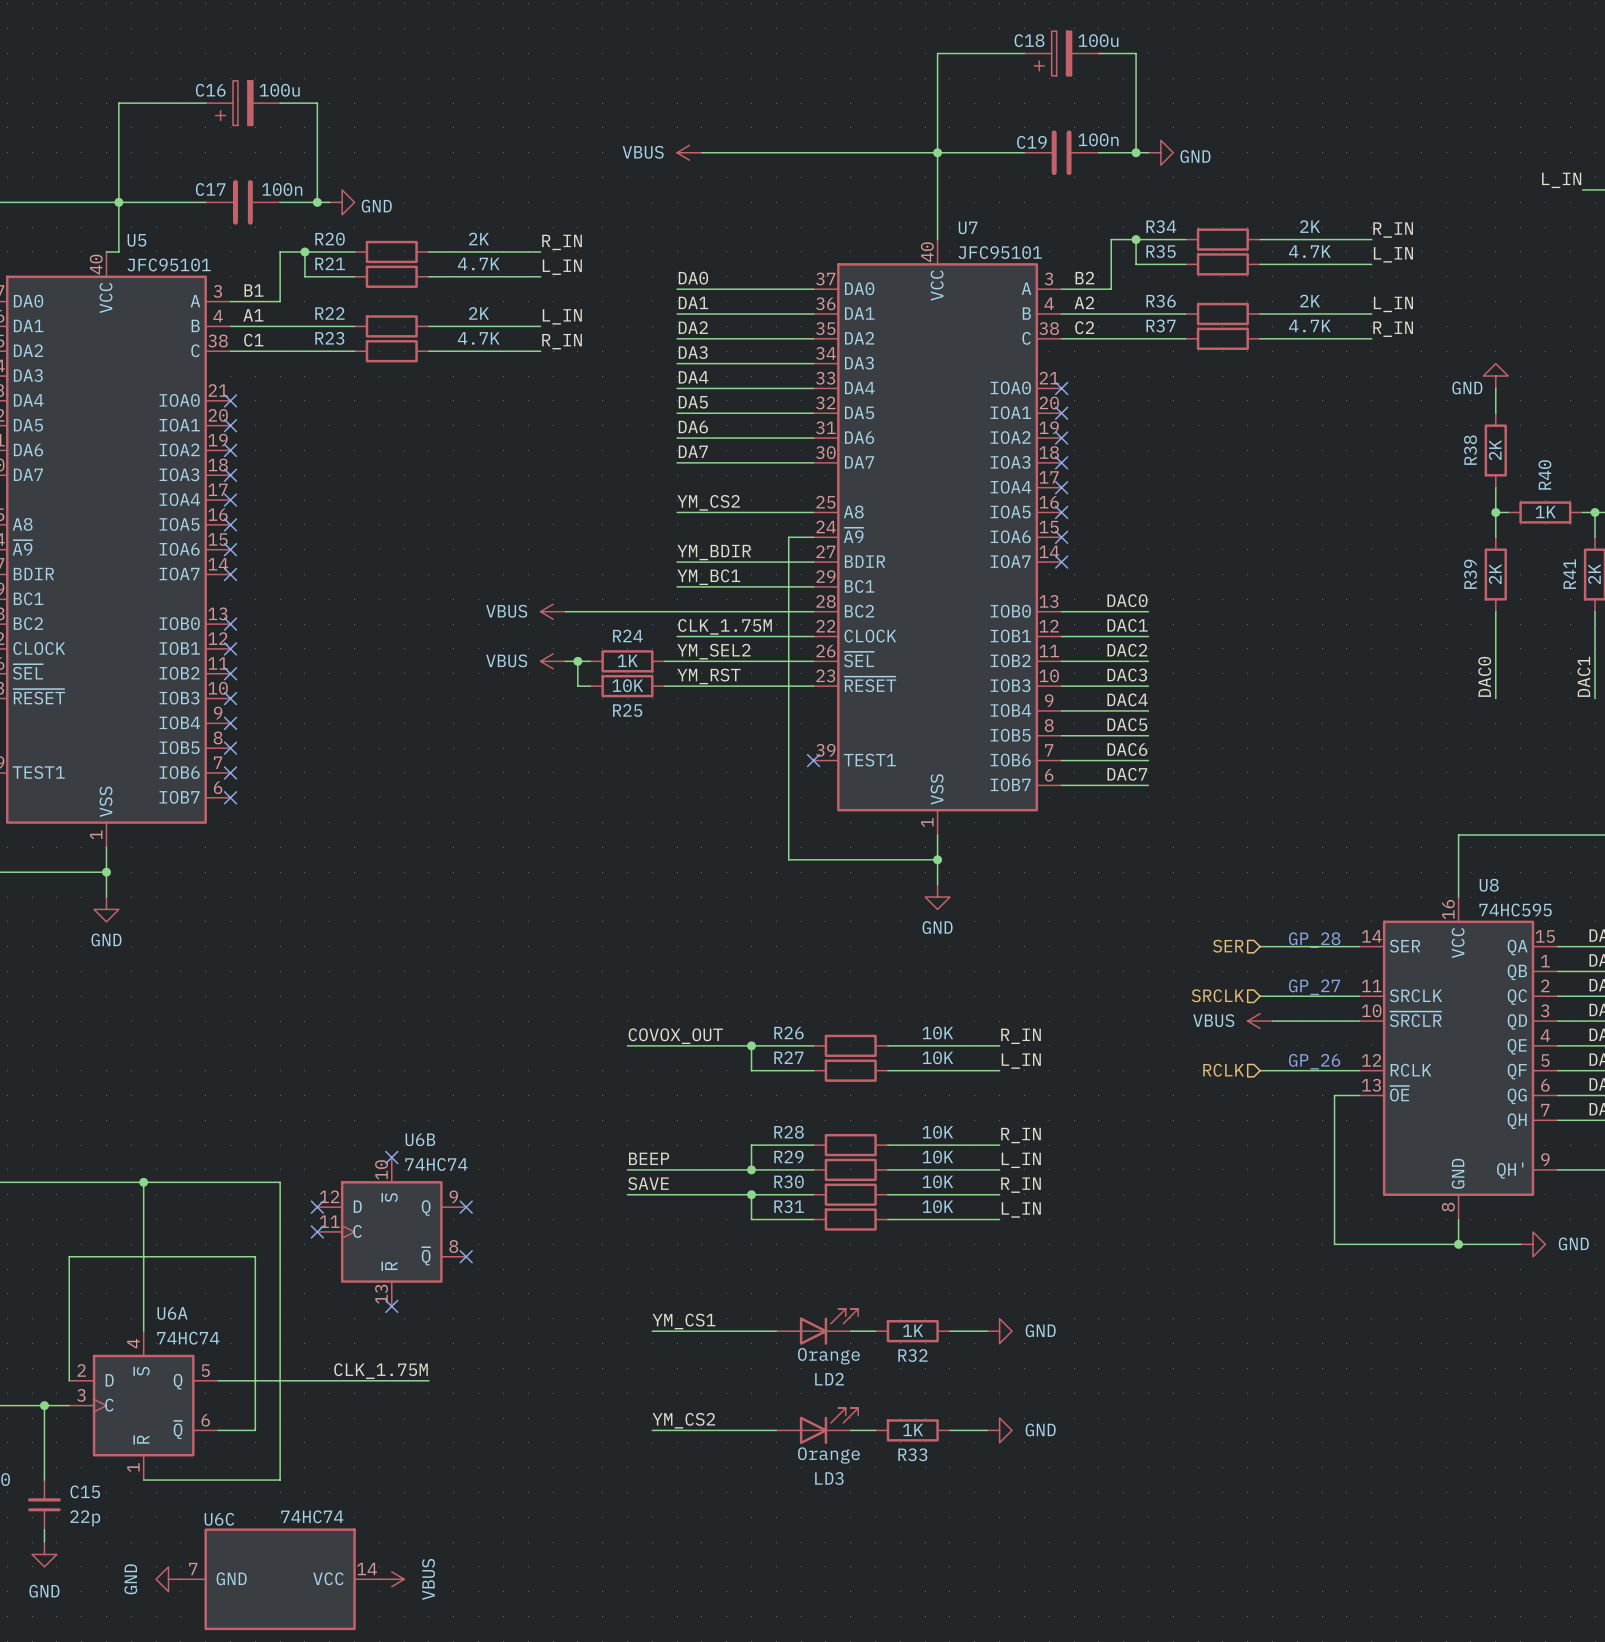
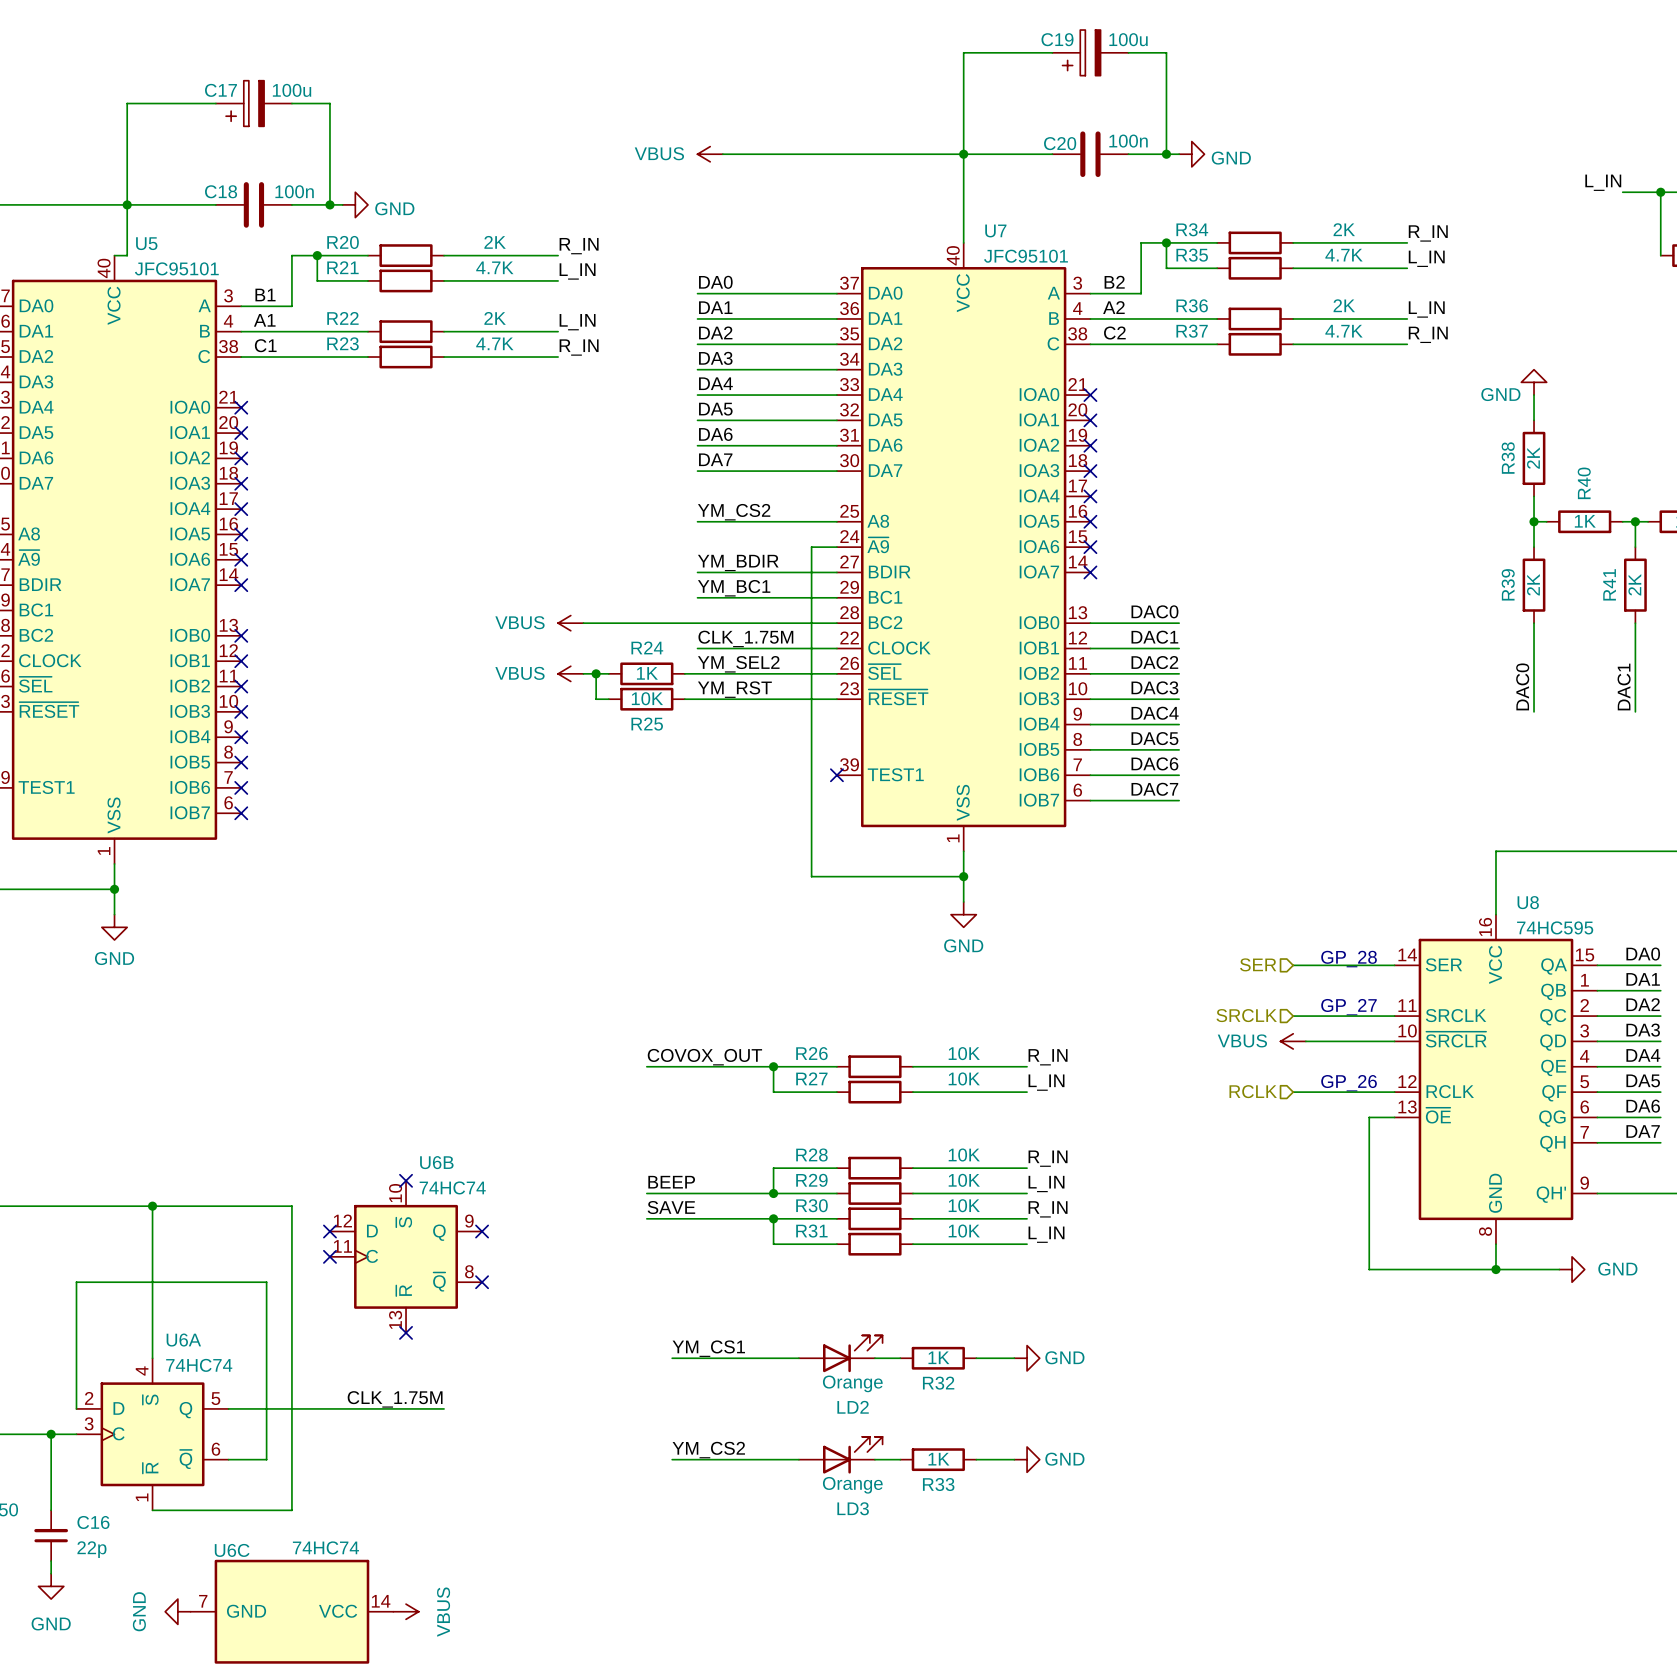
C18 name: C18 (1029, 40) -> C19 (1057, 39)
C16 name: C16 (210, 90) -> C17 (220, 90)
C19 name: C19 (1031, 142) -> C20 (1060, 143)
C17 name: C17 (210, 189) -> C18 (221, 191)
C15 name: C15 (85, 1491) -> C16 (93, 1522)

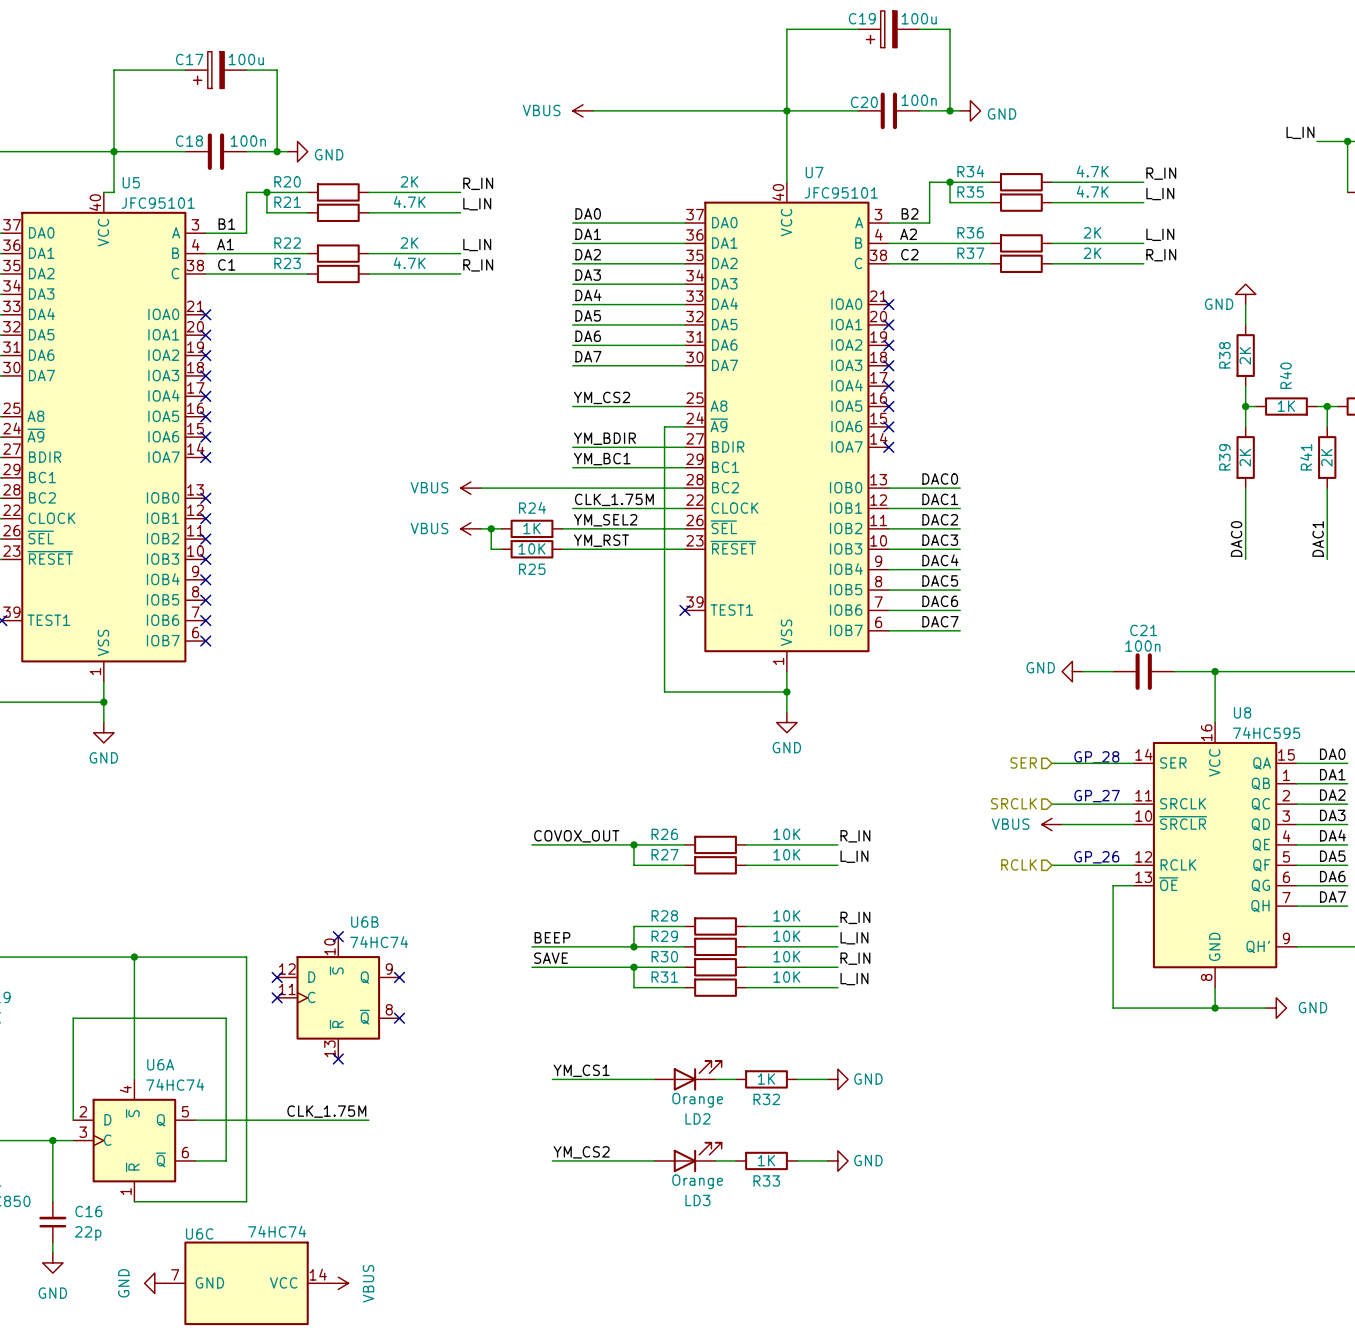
R34 value: 2K (1344, 229) -> 4.7K (1092, 171)
R37 value: 4.7K (1344, 331) -> 2K (1092, 253)
power symbol: none -> GND (1072, 671)
wire: none -> (1082, 671) (1113, 671)
C21: none -> 100n (1143, 671)
wire: none -> (1174, 671) (1215, 671)
junction: none -> (1215, 671)

